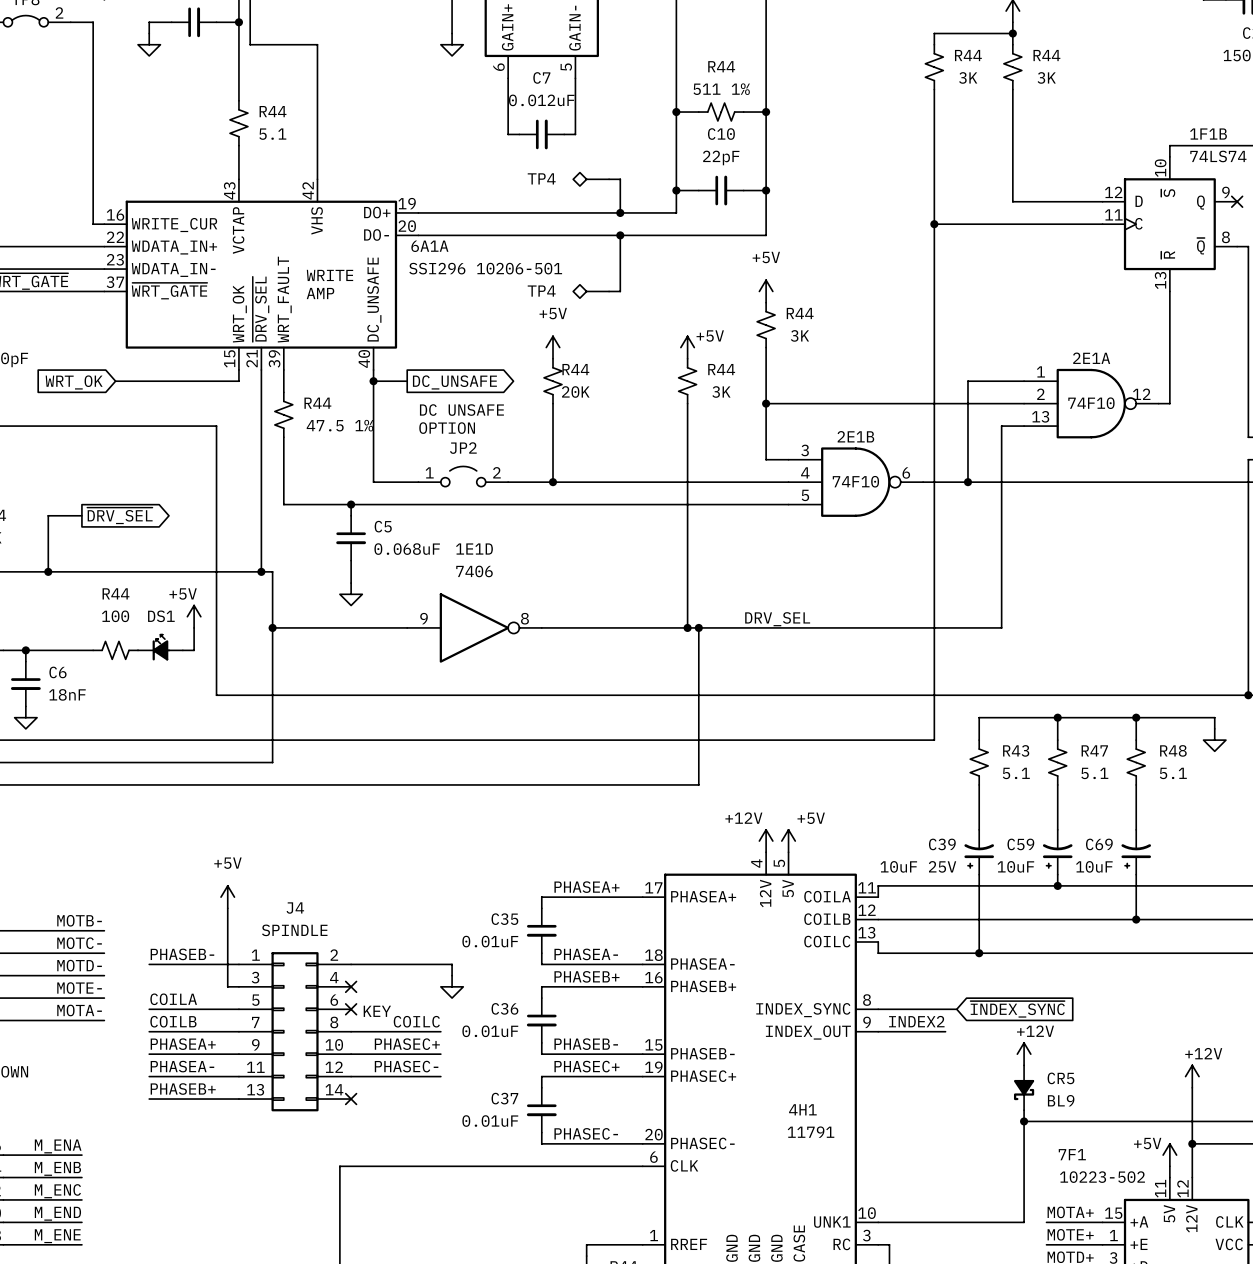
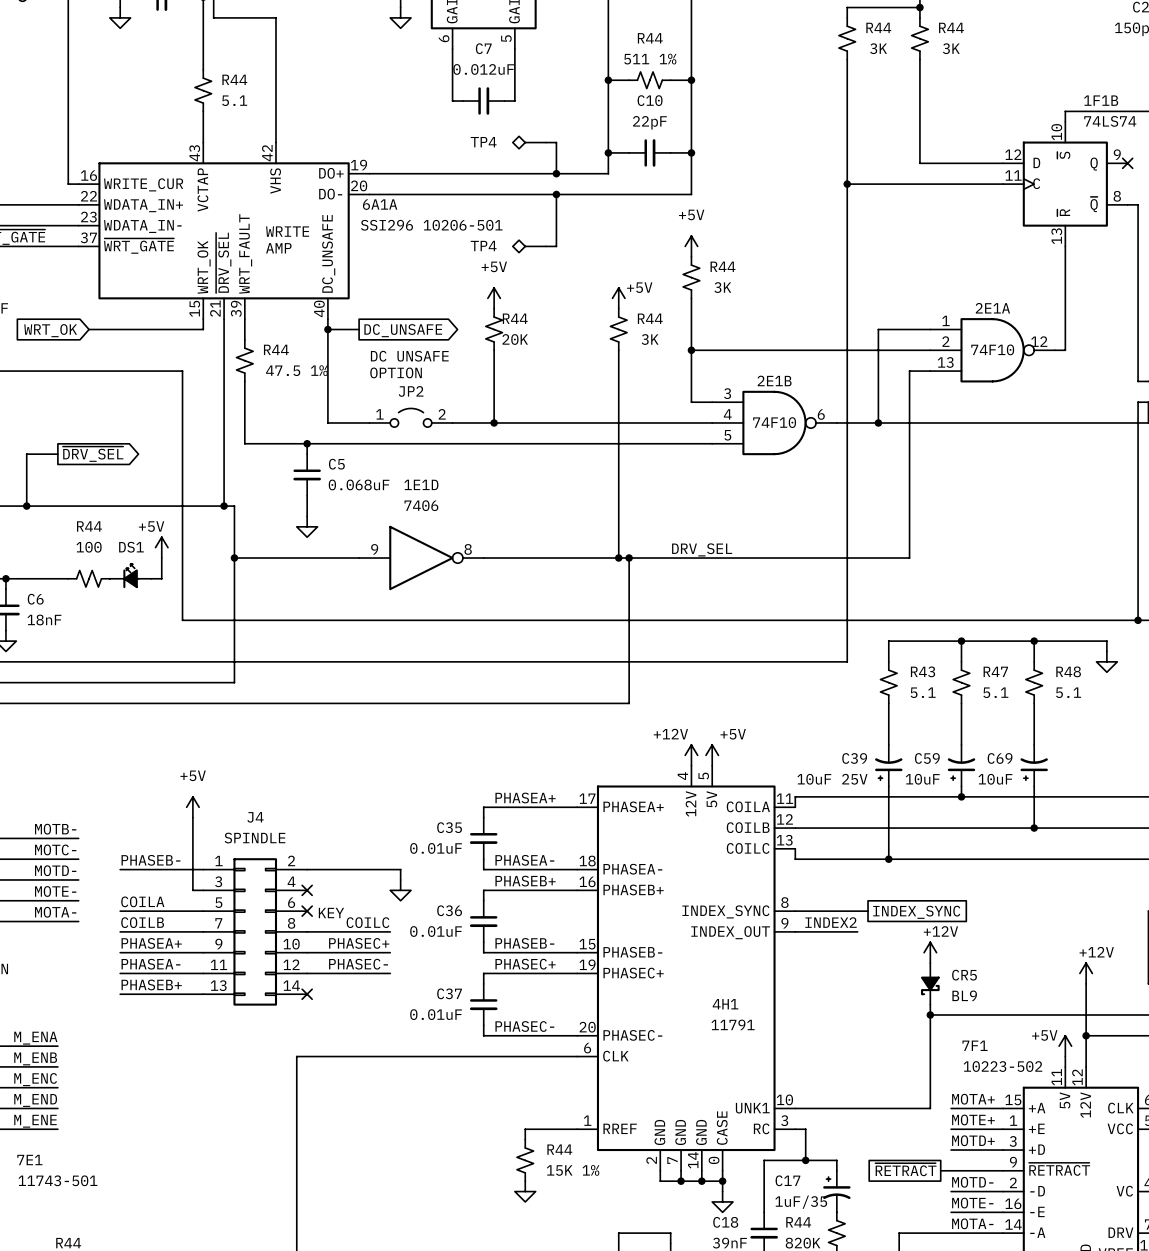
global label shape: input (1017, 1009) -> passive (916, 912)
global label: ~{INDEX_SYNC} (1017, 1009) -> INDEX_SYNC (916, 912)

